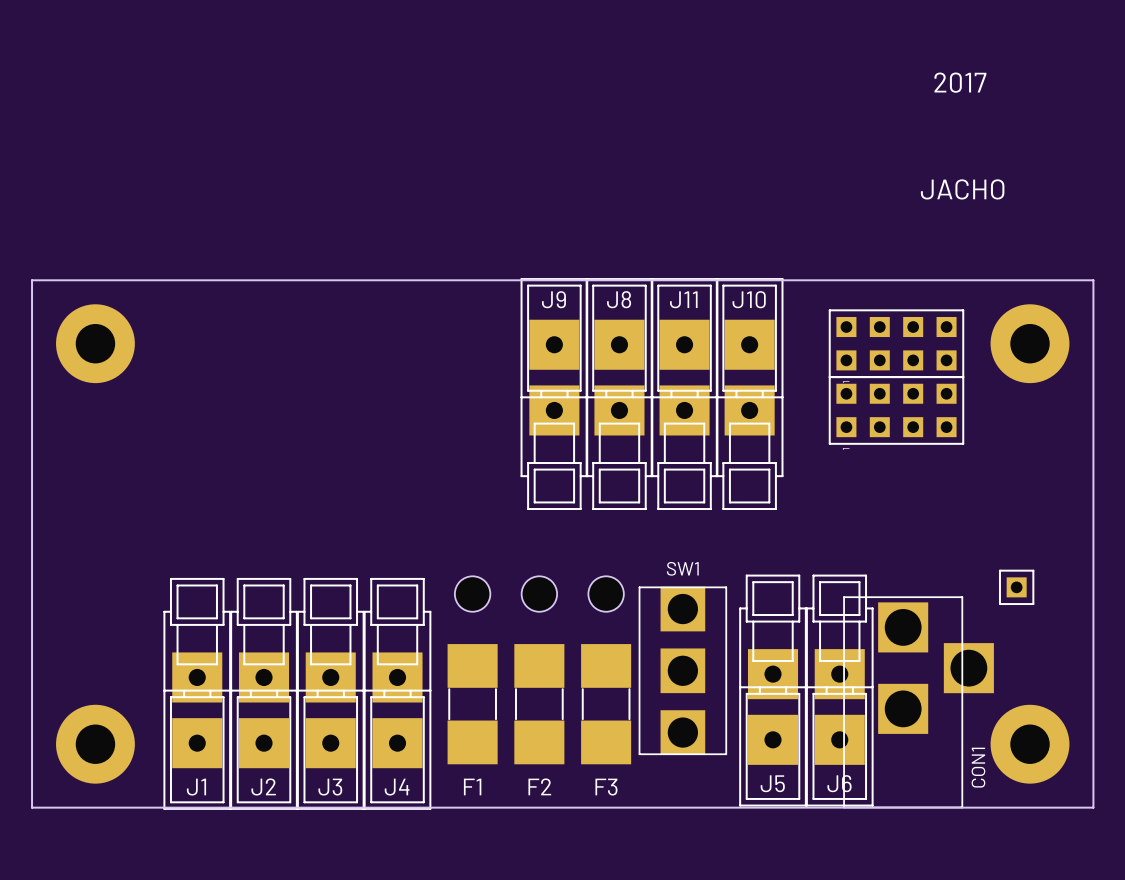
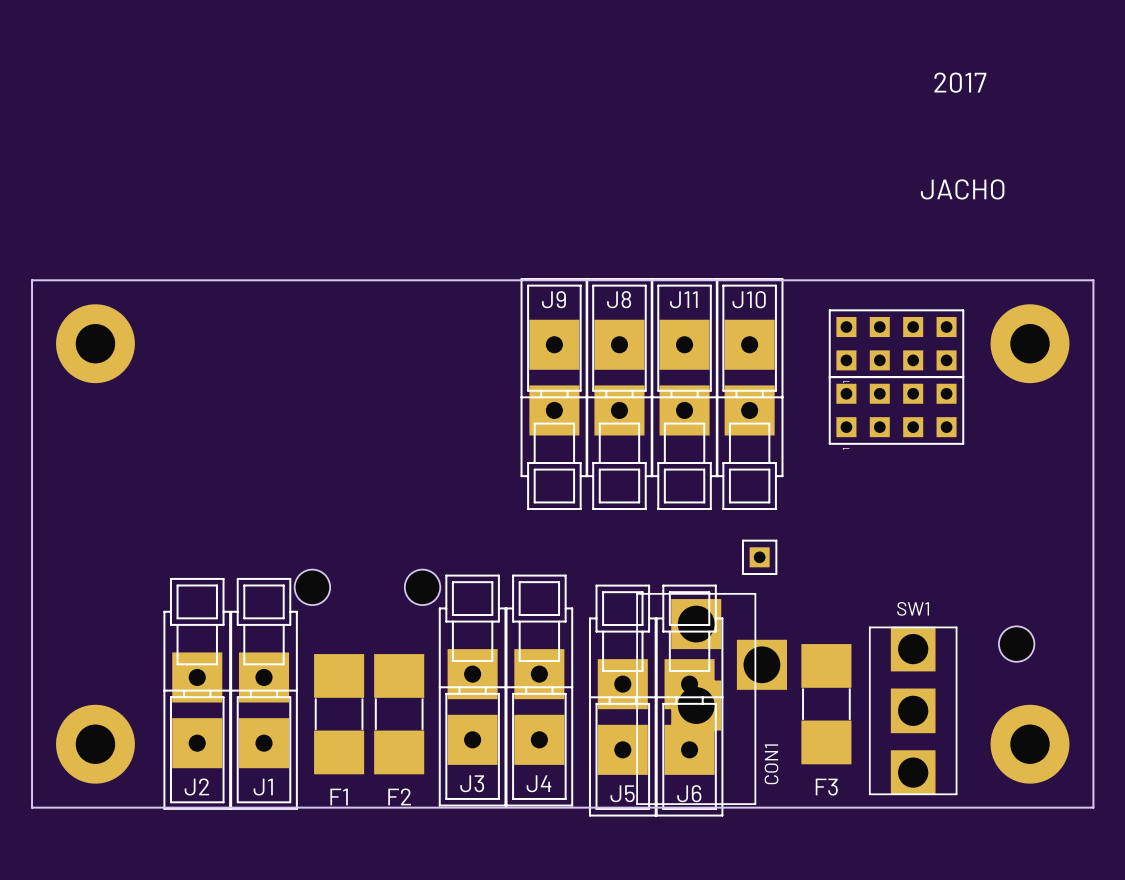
part: none -> (312, 587)
part position: (1016, 587) -> (759, 557)
part position: (472, 594) -> (422, 587)
part: (539, 594) -> none
part: (606, 594) -> none
part: none -> (1016, 644)
SW1 position: (682, 670) -> (913, 710)
J5 position: (773, 690) -> (622, 700)
J6 position: (839, 690) -> (689, 700)
J3 position: (330, 693) -> (472, 690)
J4 position: (397, 693) -> (539, 690)
CON1 position: (918, 702) -> (711, 698)
F1 position: (472, 704) -> (339, 714)
F2 position: (539, 704) -> (399, 714)
F3 position: (606, 704) -> (826, 704)
J2 name: J2 (263, 786) -> J1 (263, 787)
J1 name: J1 (196, 787) -> J2 (196, 786)

